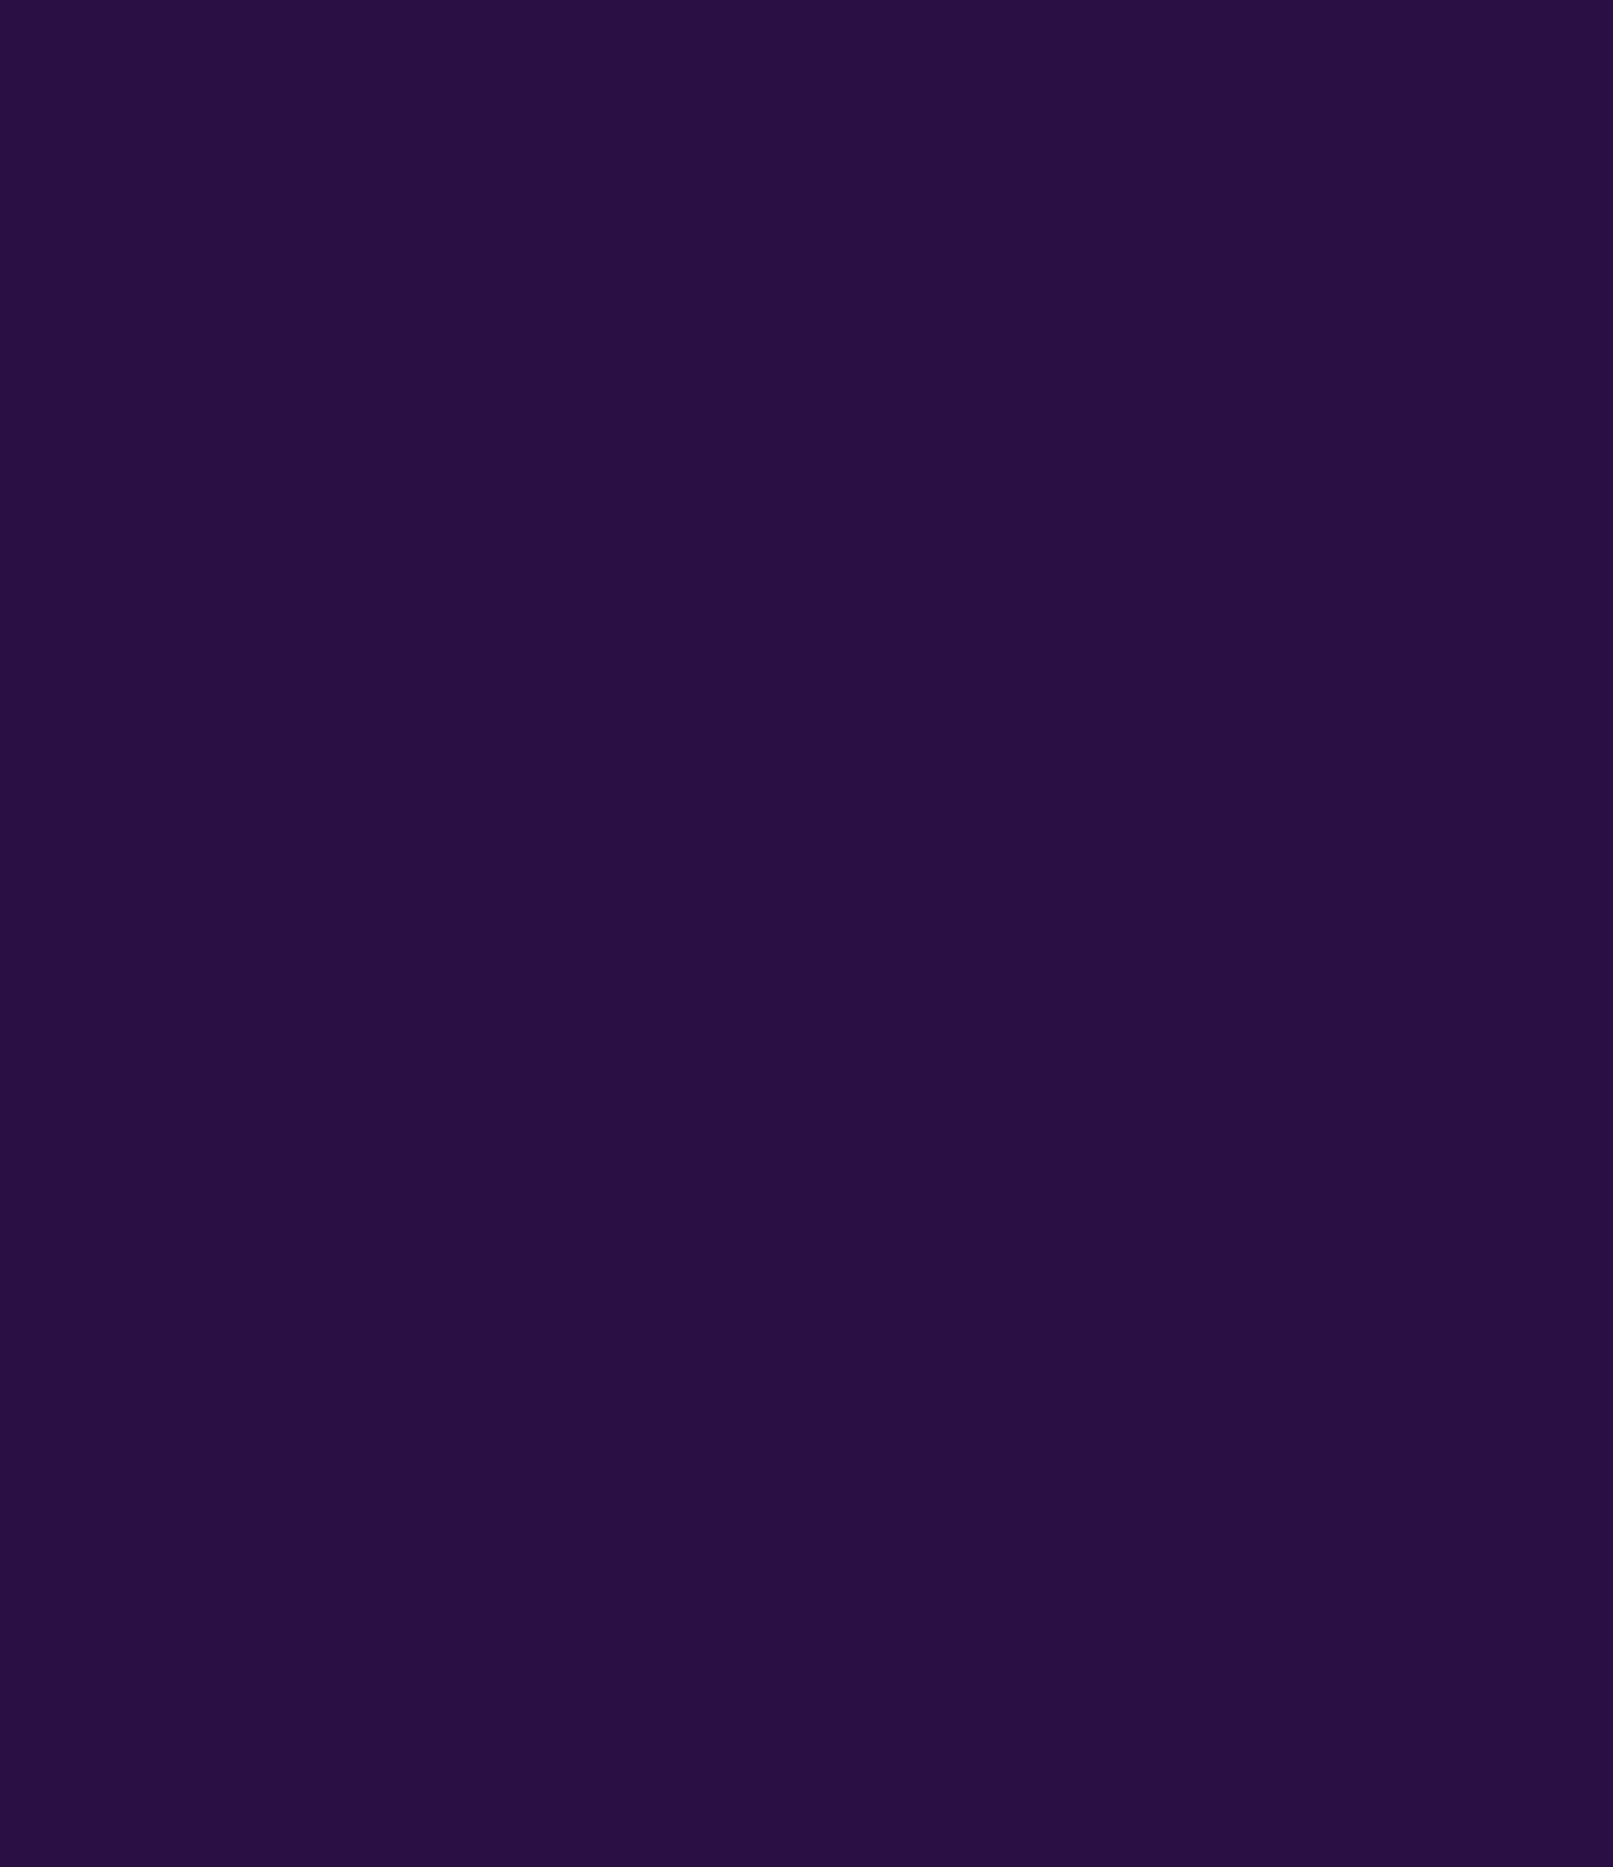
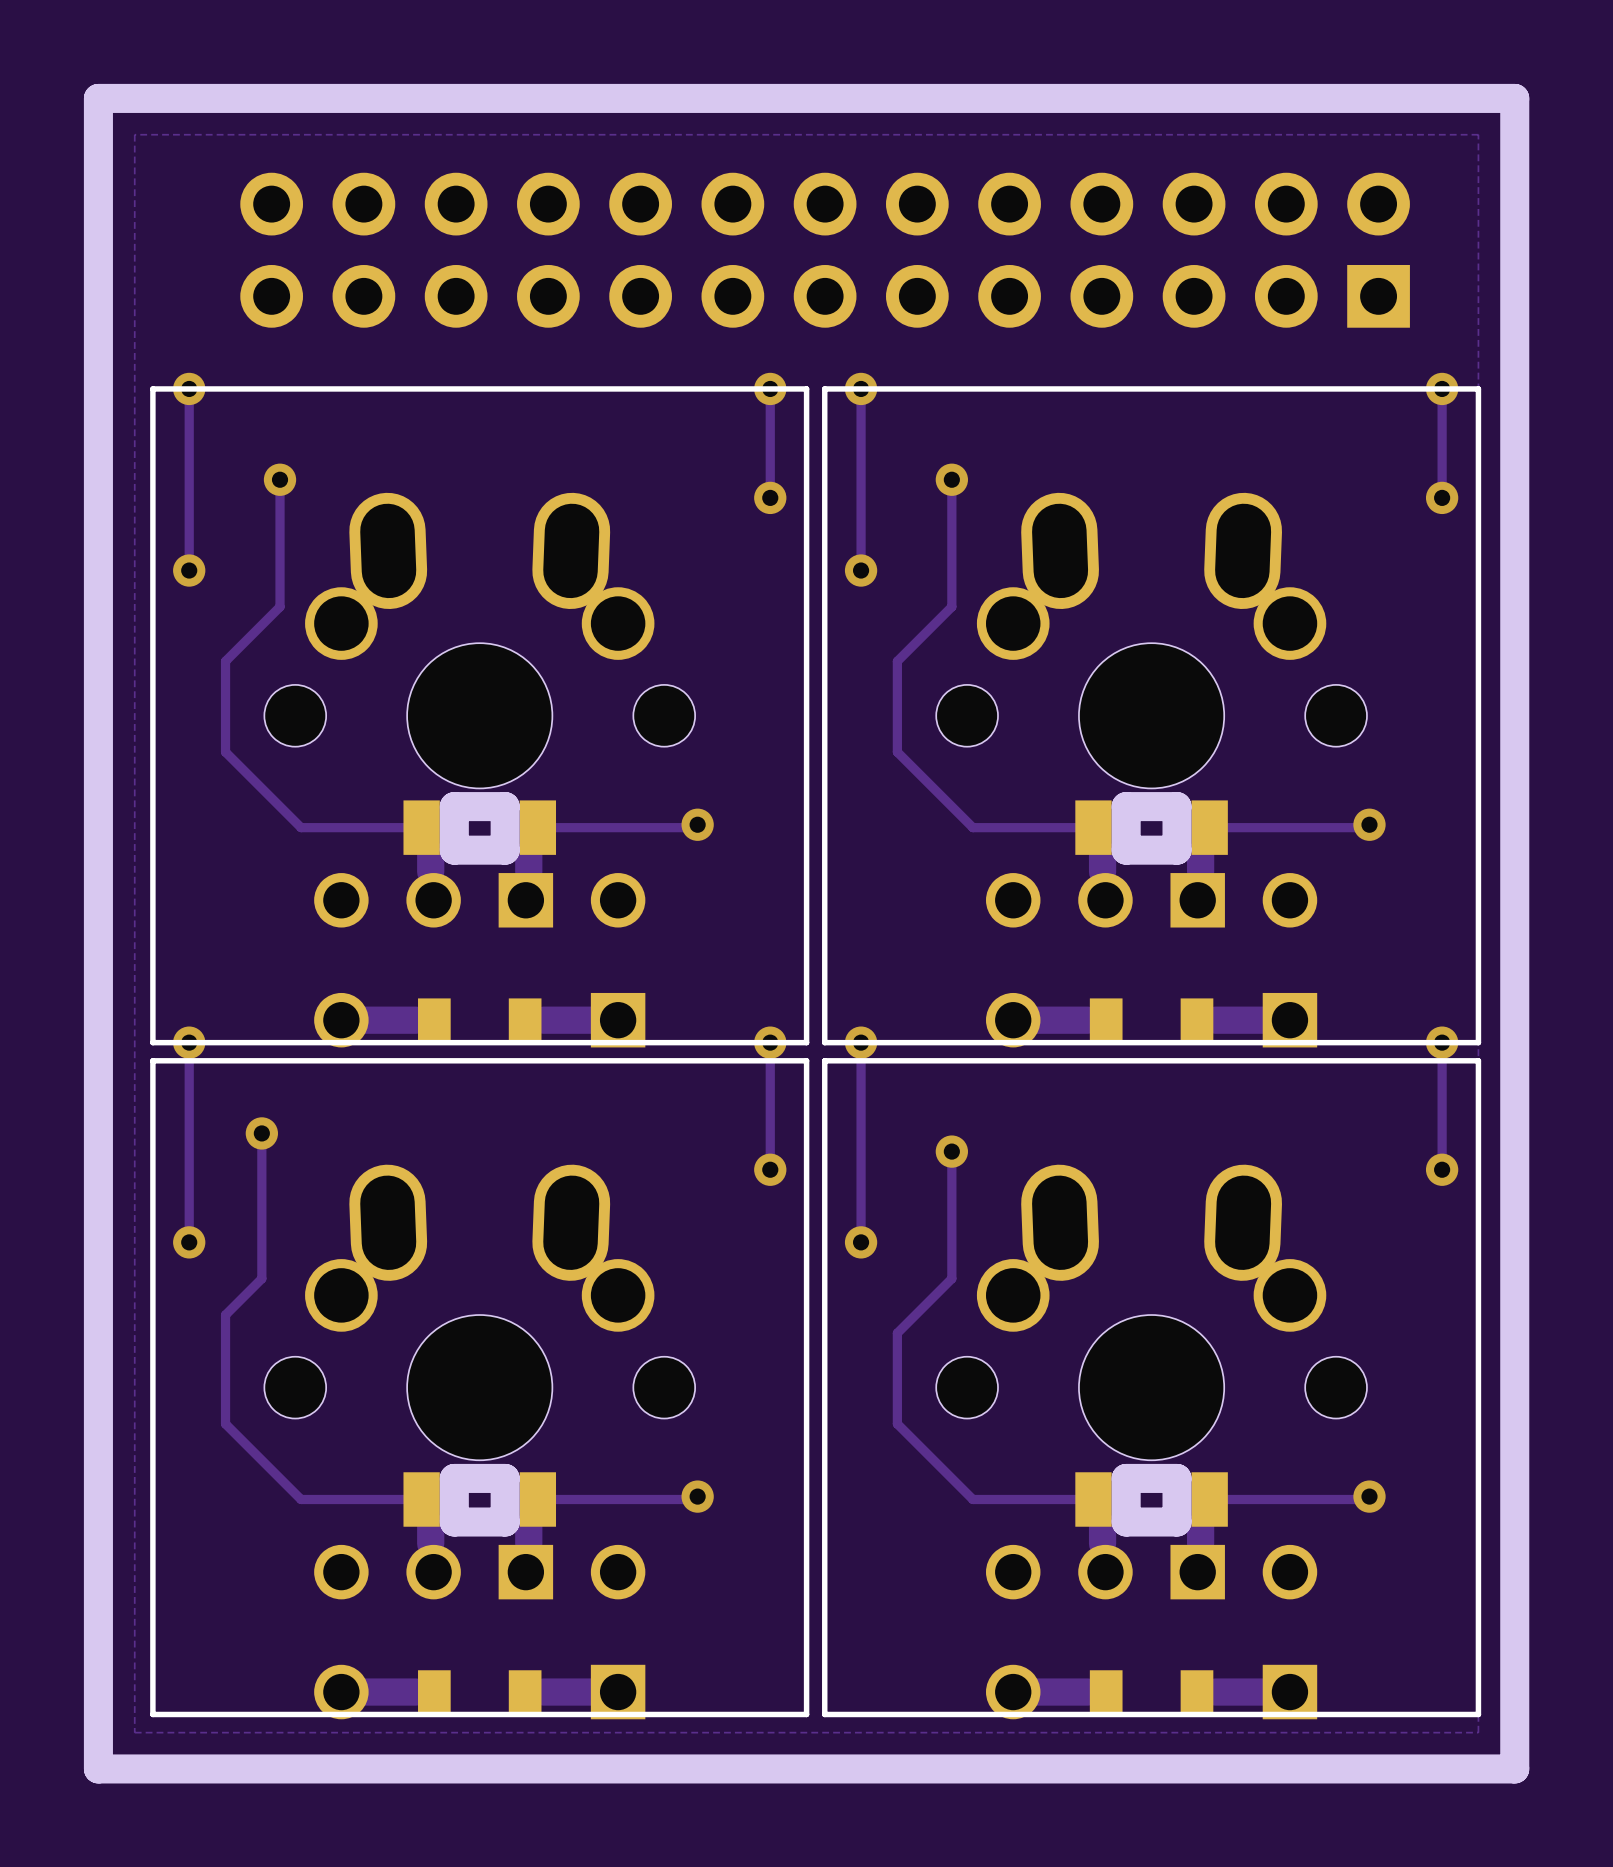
board edge: none -> (1514, 98) (1514, 1768) (98, 1768) (98, 98) (1514, 98)
zone outline: none -> (1478, 134) (1478, 1732) (134, 1732) (134, 134) (1478, 134)
part: none -> (825, 250)
track: none -> (189, 388) (189, 570)
via: none -> (189, 388)
track: none -> (770, 388) (770, 497)
via: none -> (770, 388)
track: none -> (861, 388) (861, 570)
via: none -> (861, 388)
track: none -> (1442, 388) (1442, 497)
via: none -> (1442, 388)
track: none -> (280, 479) (280, 606) (225, 661) (225, 752) (301, 827) (421, 827)
via: none -> (280, 479)
track: none -> (951, 479) (951, 606) (897, 661) (897, 752) (972, 827) (1093, 827)
via: none -> (951, 479)
via: none -> (770, 497)
via: none -> (1442, 497)
via: none -> (189, 570)
via: none -> (861, 570)
part: none -> (479, 716)
part: none -> (1151, 716)
track: none -> (697, 824) (694, 827) (537, 827)
via: none -> (697, 824)
track: none -> (1369, 824) (1366, 827) (1209, 827)
via: none -> (1369, 824)
track: none -> (189, 1042) (189, 1242)
via: none -> (189, 1042)
track: none -> (770, 1042) (770, 1169)
via: none -> (770, 1042)
track: none -> (861, 1042) (861, 1242)
via: none -> (861, 1042)
track: none -> (1442, 1042) (1442, 1169)
via: none -> (1442, 1042)
track: none -> (261, 1133) (261, 1278) (225, 1315) (225, 1423) (301, 1499) (421, 1499)
via: none -> (261, 1133)
track: none -> (951, 1151) (951, 1278) (897, 1333) (897, 1423) (972, 1499) (1093, 1499)
via: none -> (951, 1151)
via: none -> (770, 1169)
via: none -> (1442, 1169)
via: none -> (189, 1242)
via: none -> (861, 1242)
part: none -> (479, 1388)
part: none -> (1151, 1388)
track: none -> (697, 1496) (694, 1499) (537, 1499)
via: none -> (697, 1496)
track: none -> (1369, 1496) (1366, 1499) (1209, 1499)
via: none -> (1369, 1496)

